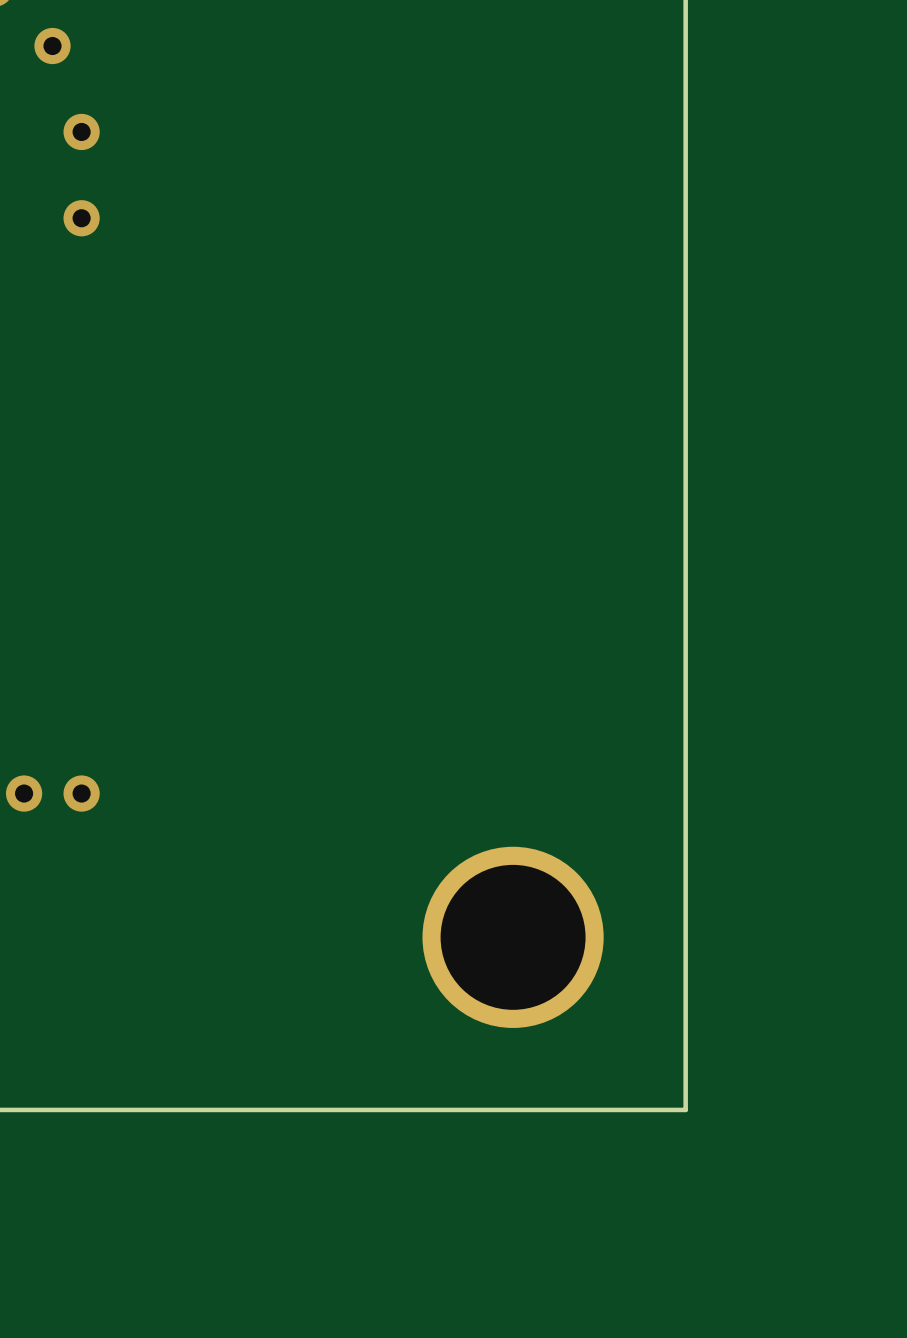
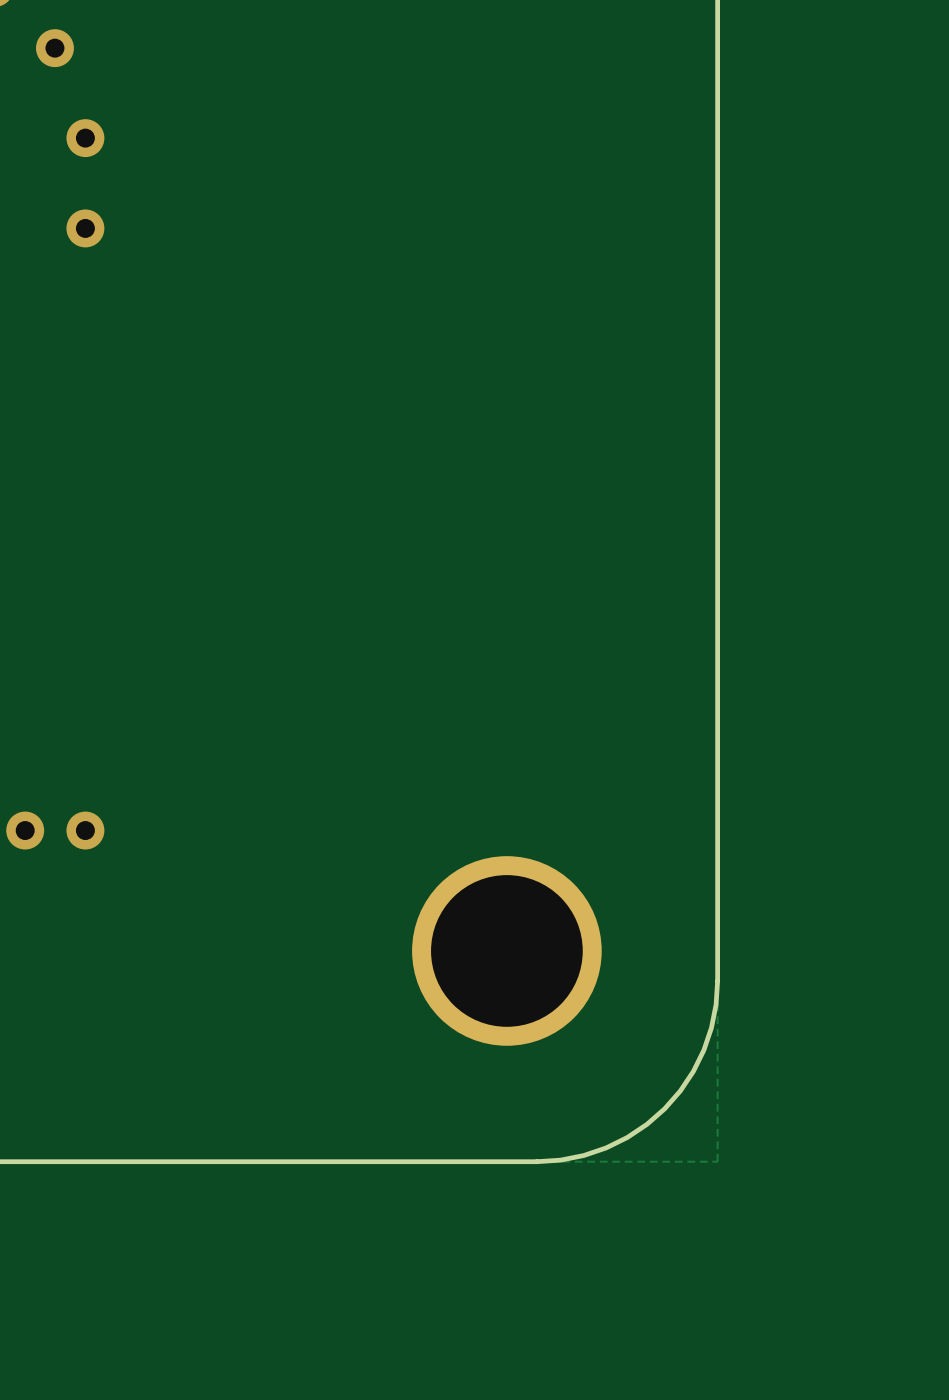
part position: (513, 937) -> (506, 950)
board edge: (685, 937) (685, 1109) (513, 1109) -> (717, 981) (716, 1004) (711, 1027) (703, 1050) (693, 1071) (680, 1091) (664, 1108) (646, 1124) (627, 1137) (606, 1147) (583, 1155) (560, 1160) (537, 1161)

